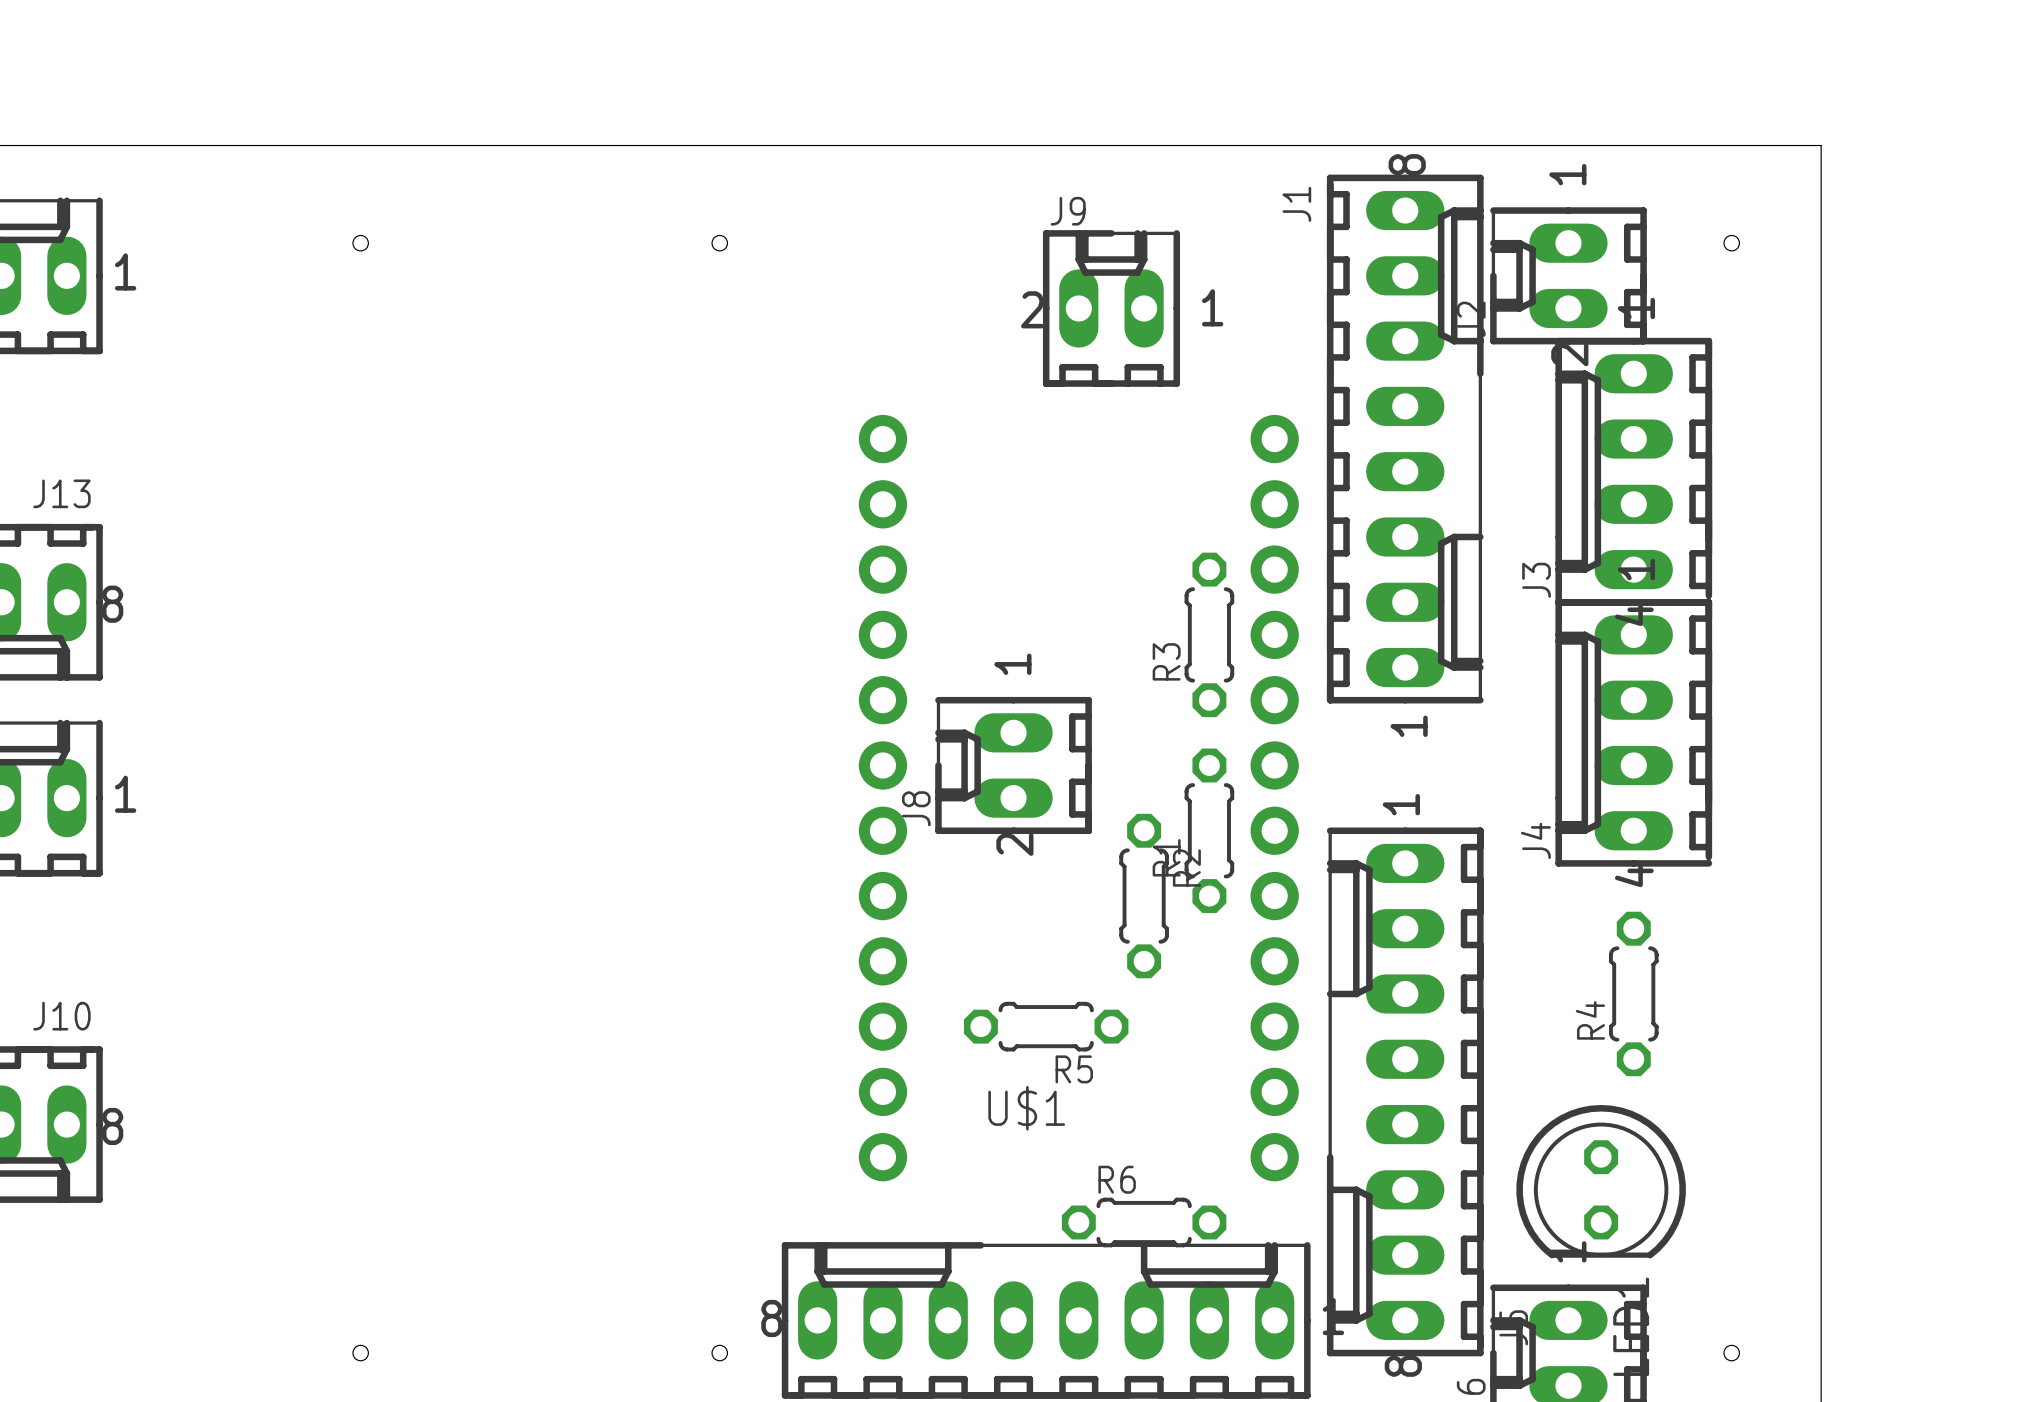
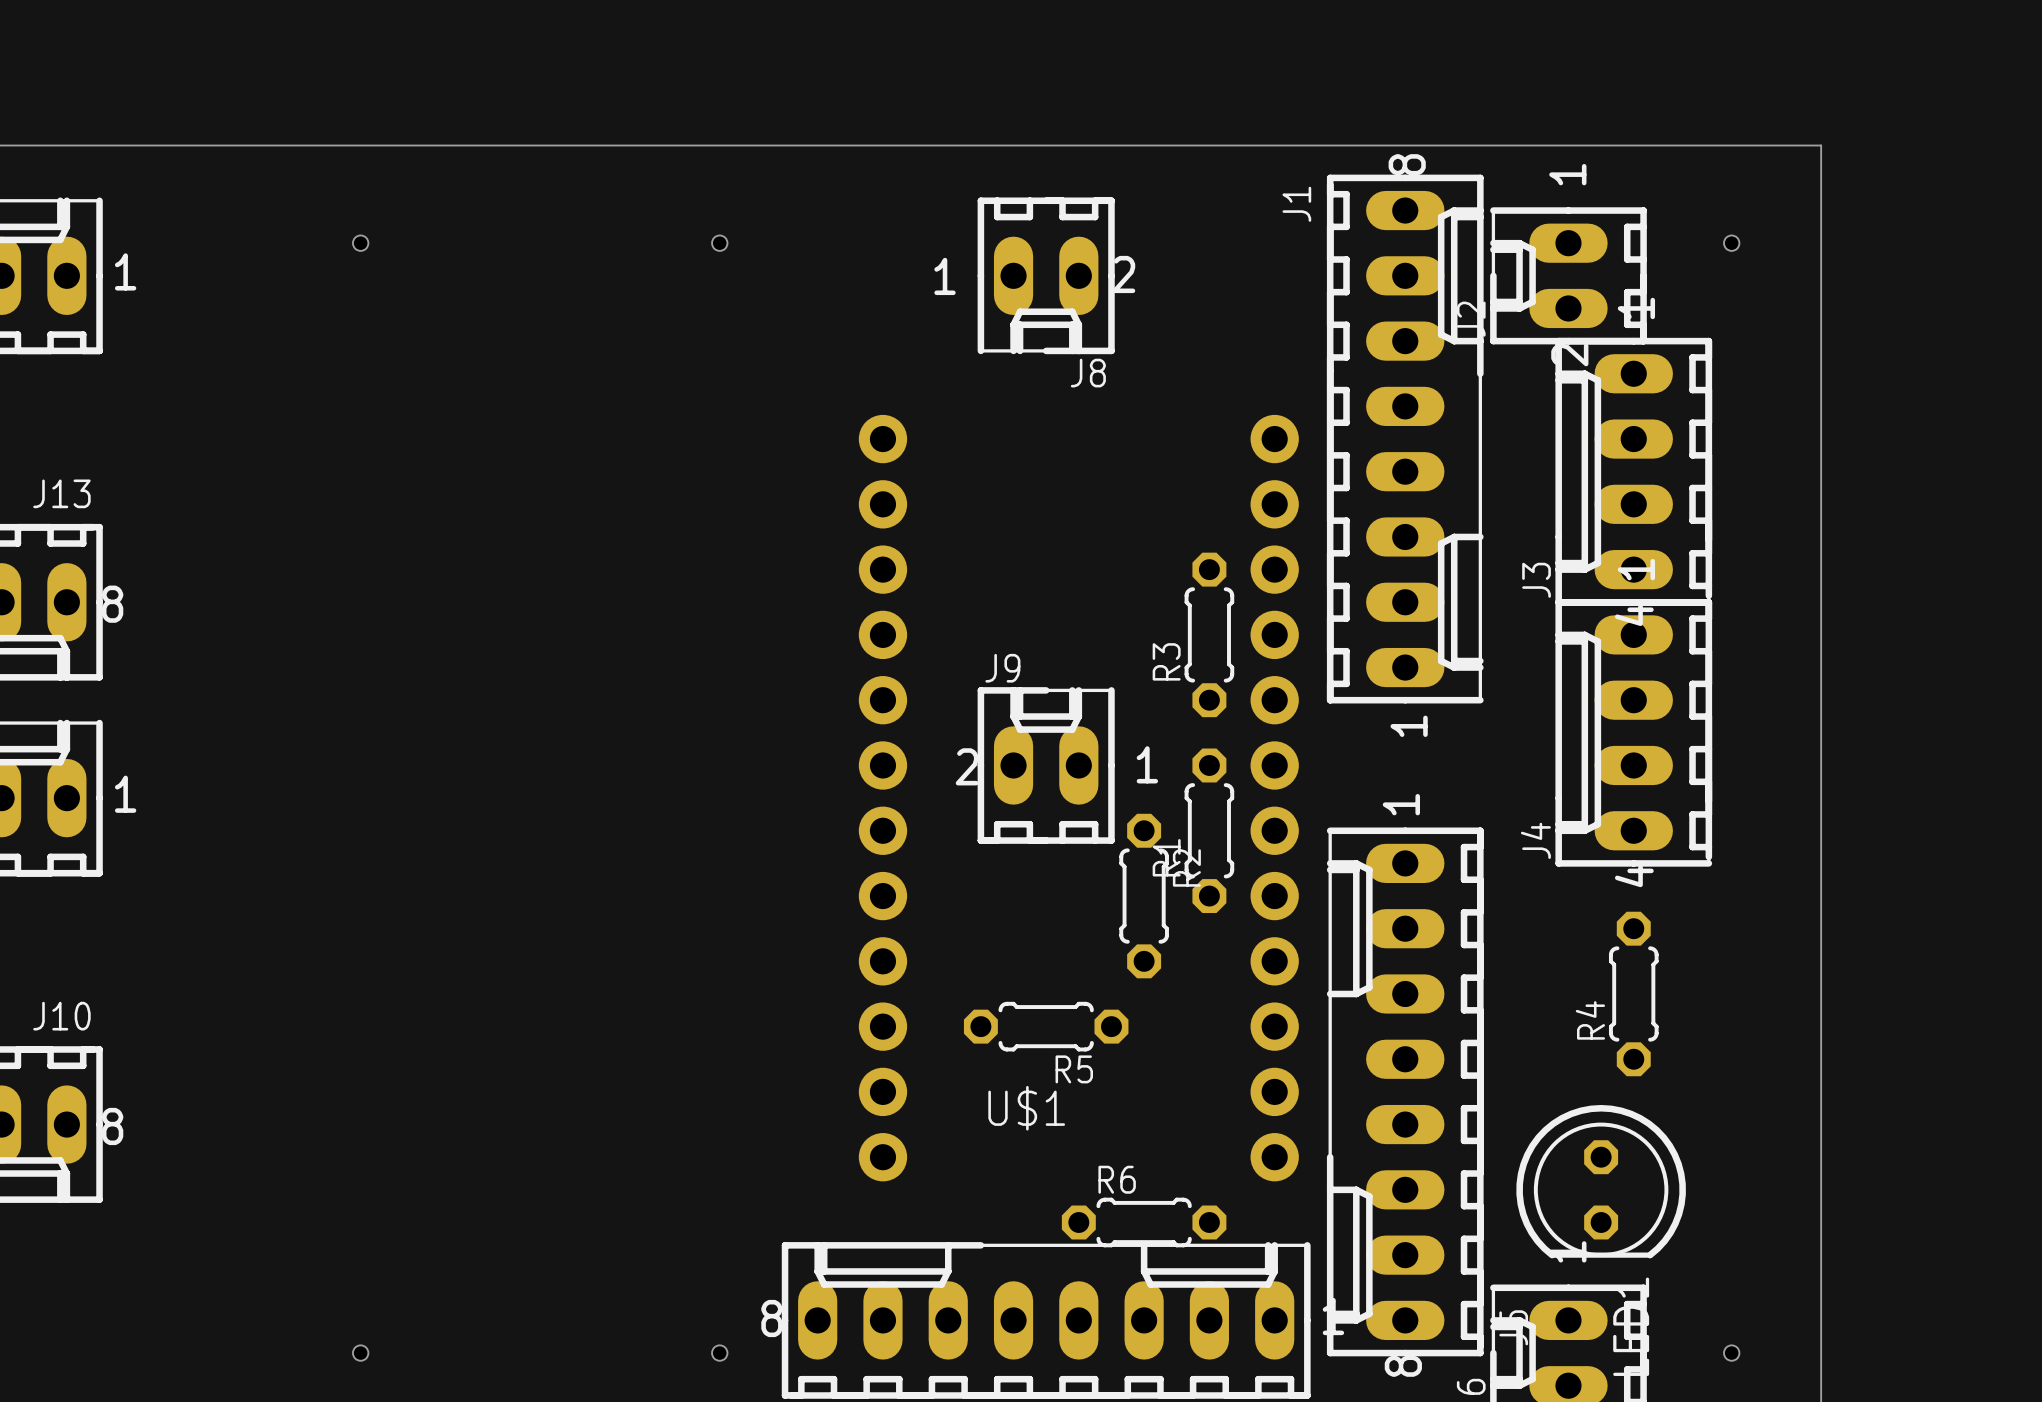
J9 position: (1111, 308) -> (1046, 765)
J8 footprint: [935, 696, 1092, 835] -> [977, 197, 1115, 355]
J8 name position: J8 (916, 808) -> J8 (1088, 373)

